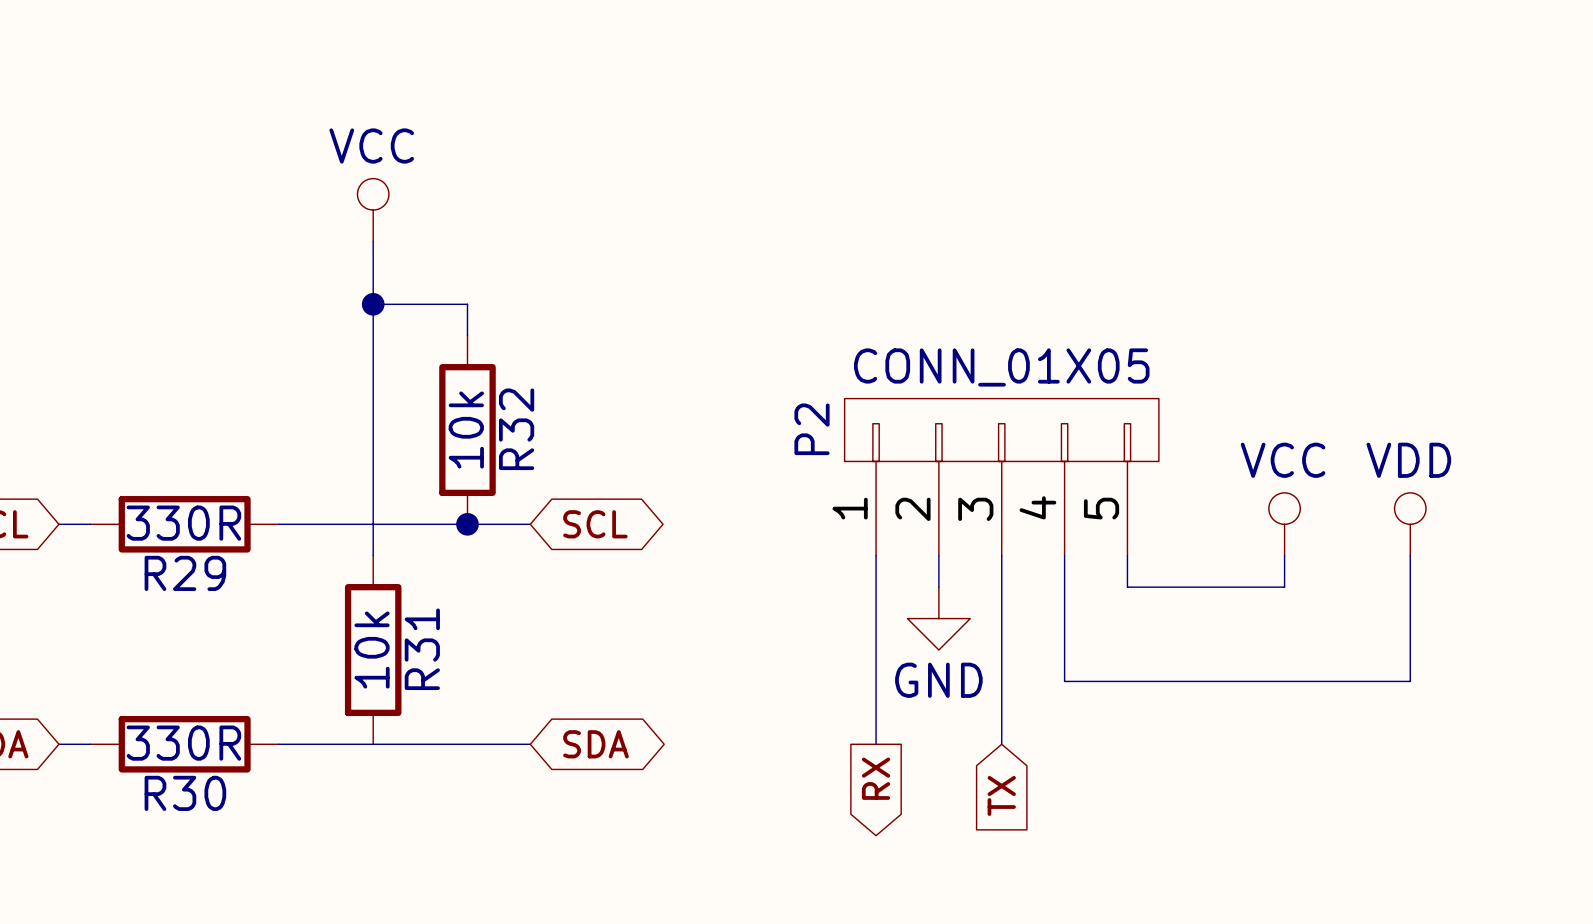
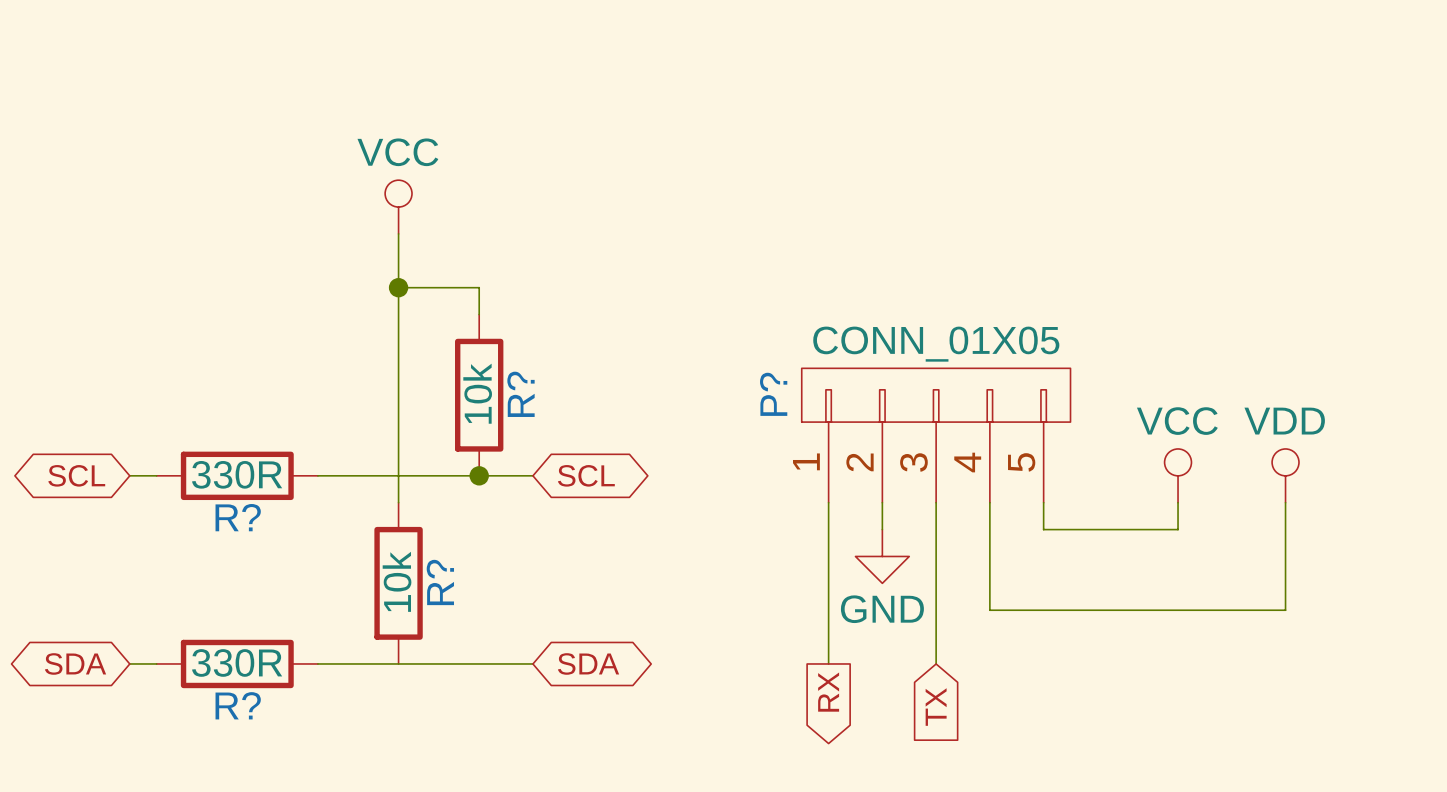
R32 name: R32 (516, 429) -> R? (520, 394)
P2 name: P2 (812, 429) -> P? (773, 394)
R29 name: R29 (185, 573) -> R? (238, 517)
R31 name: R31 (422, 649) -> R? (440, 582)
R30 name: R30 (185, 793) -> R? (238, 705)

